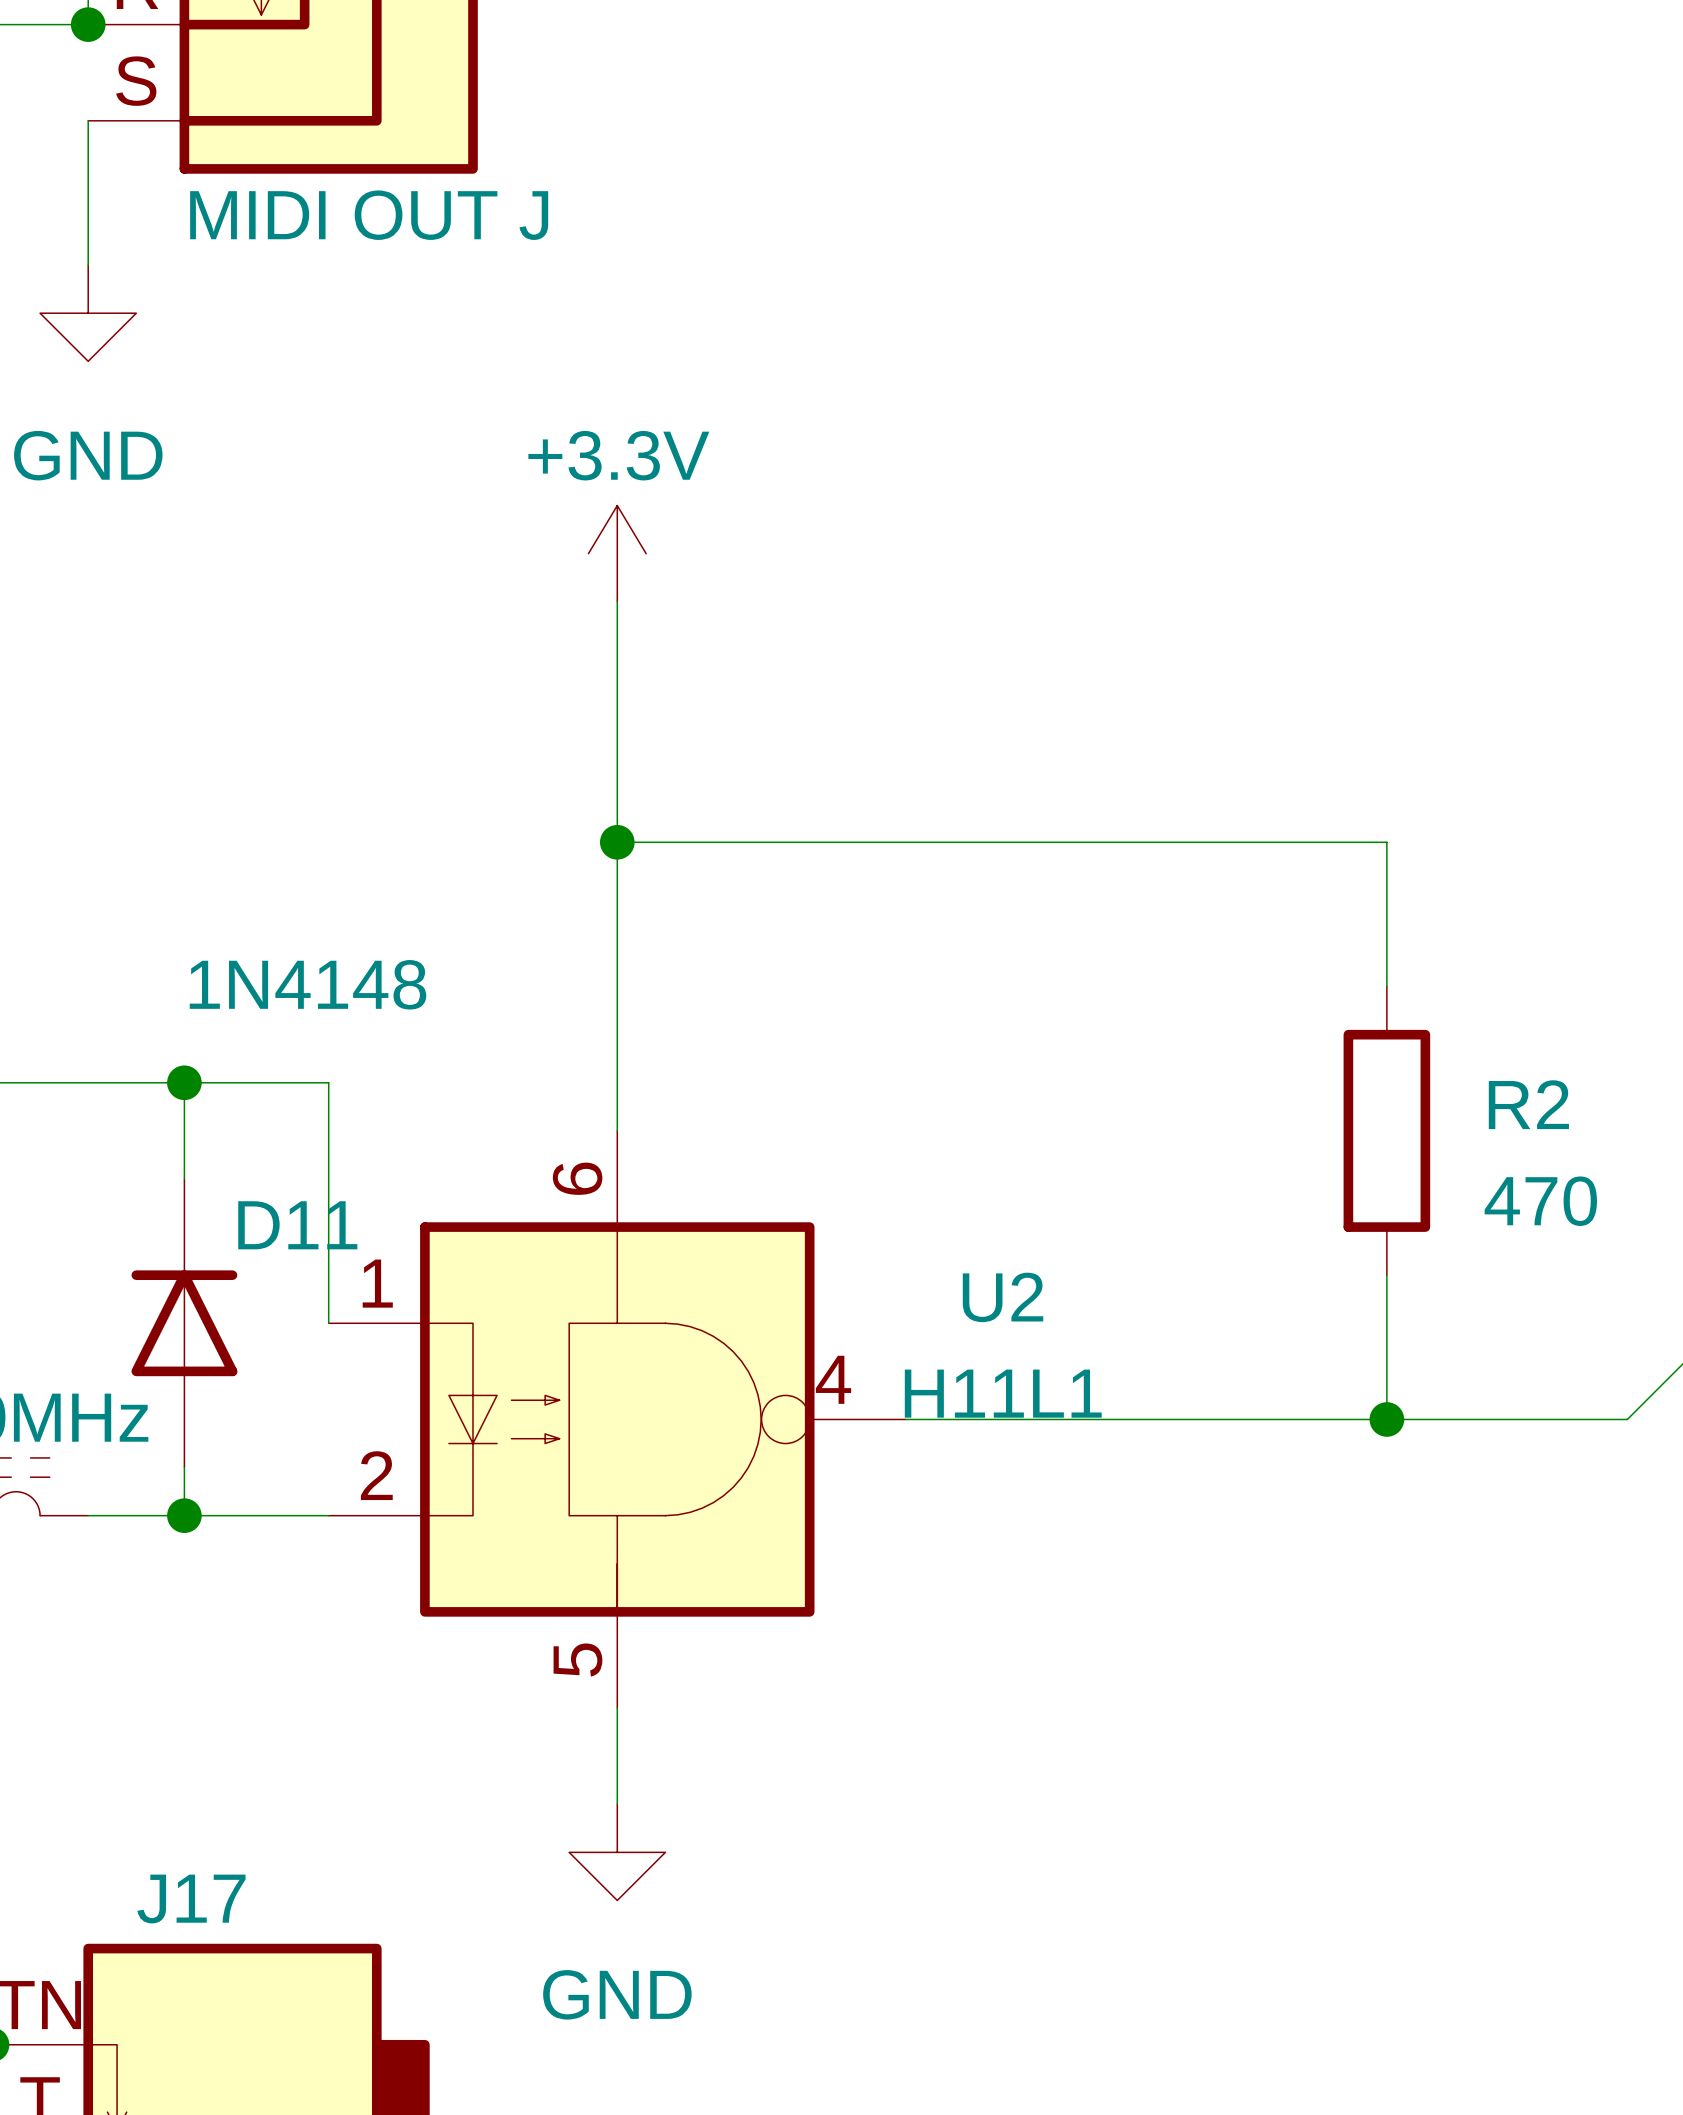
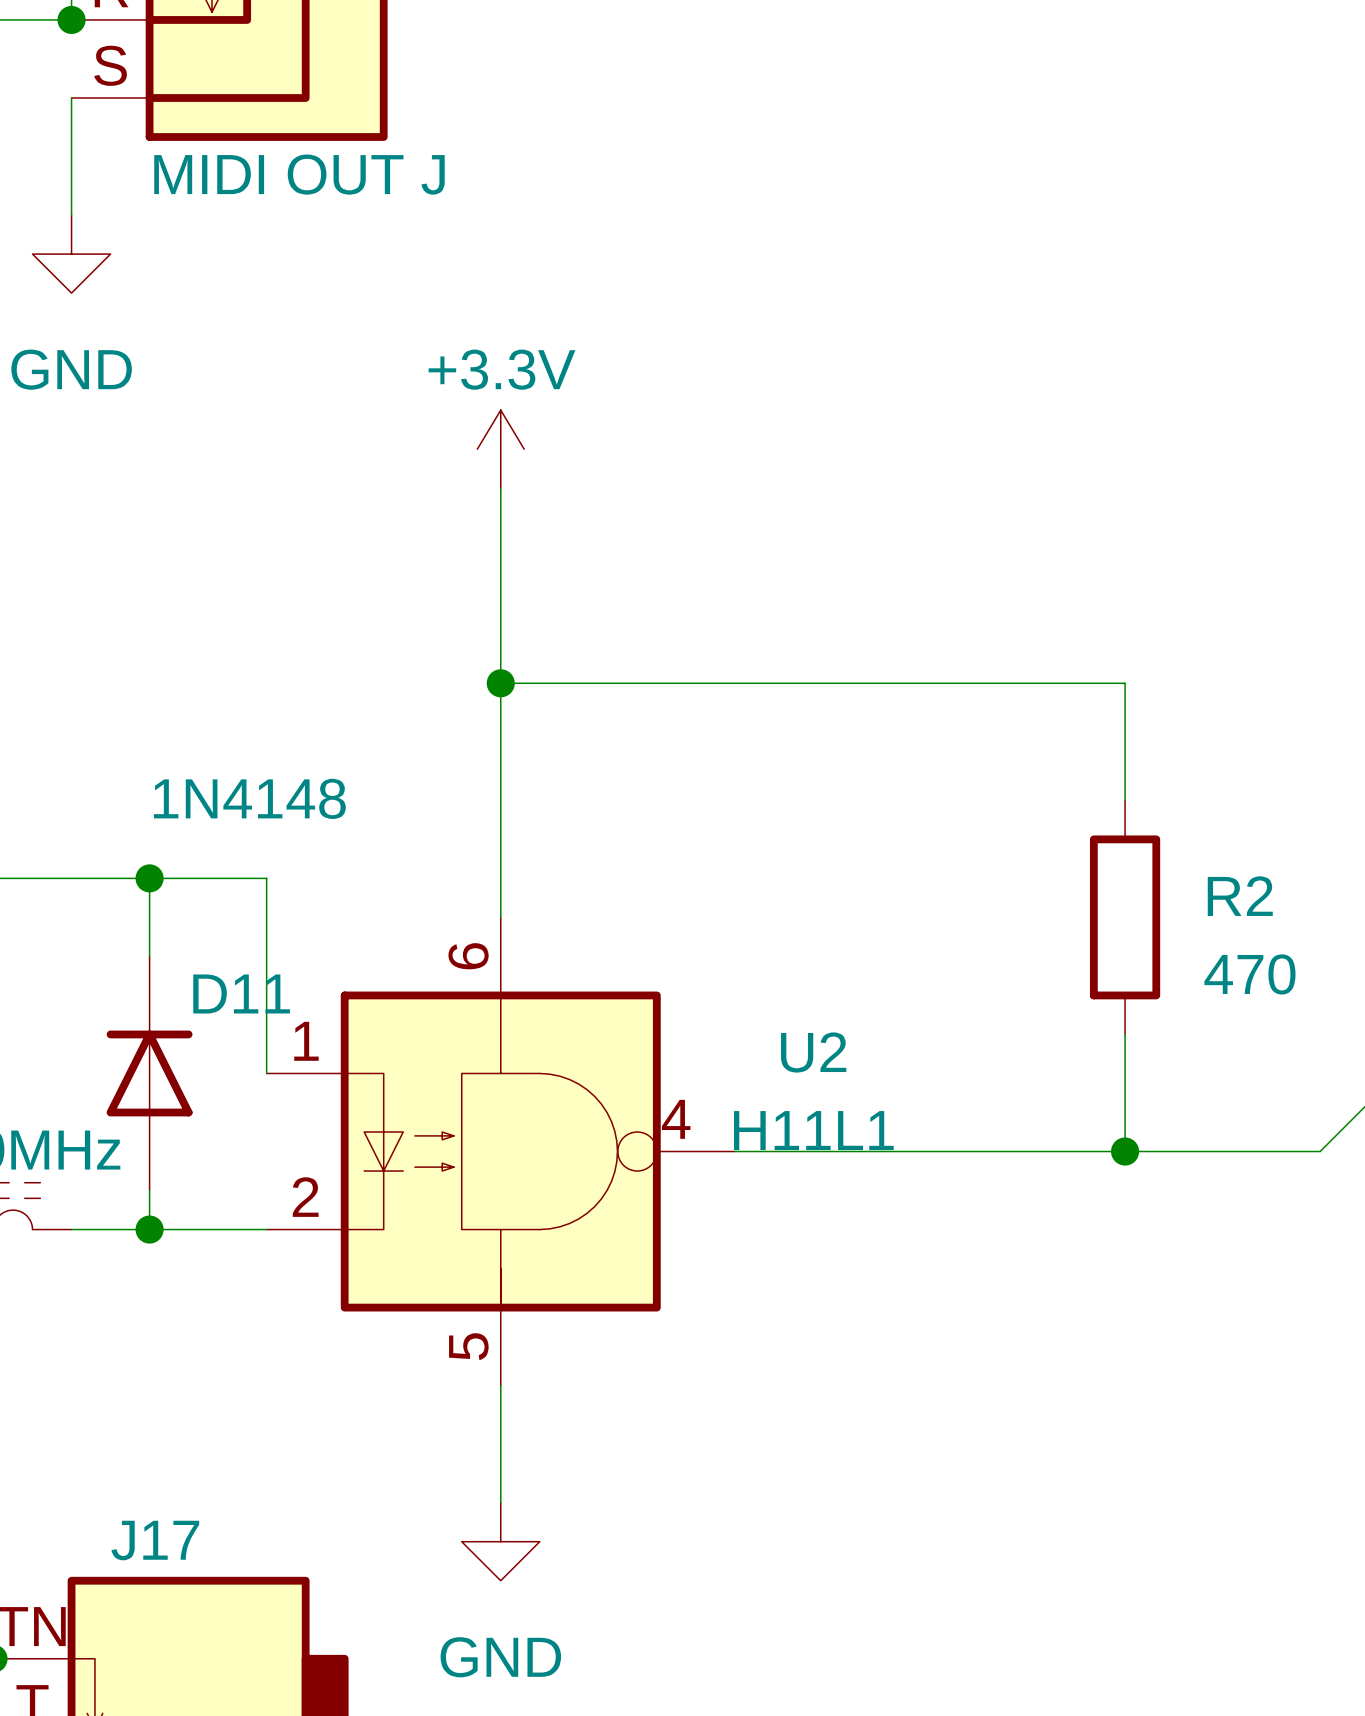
power symbol position: GND (617, 1852) -> GND (500, 1541)

